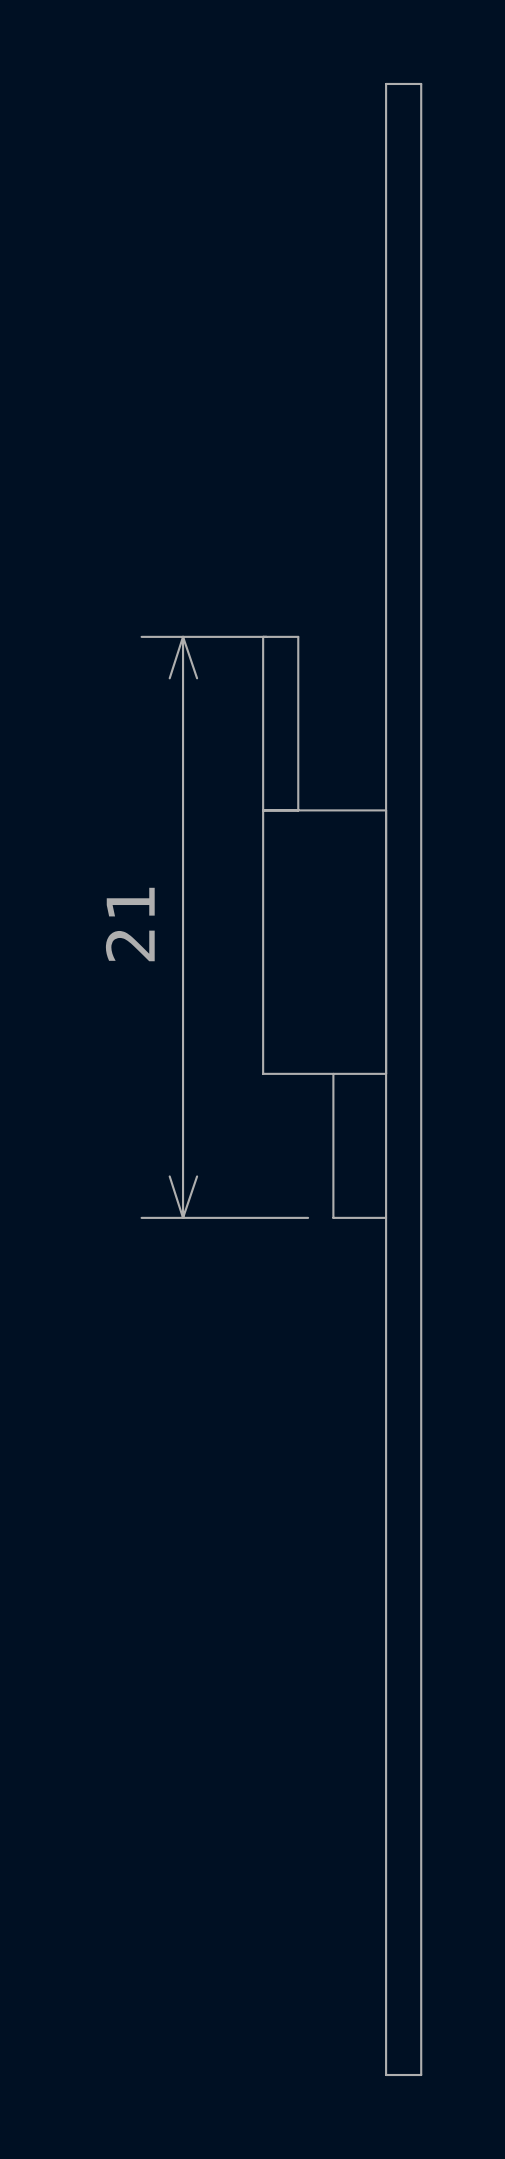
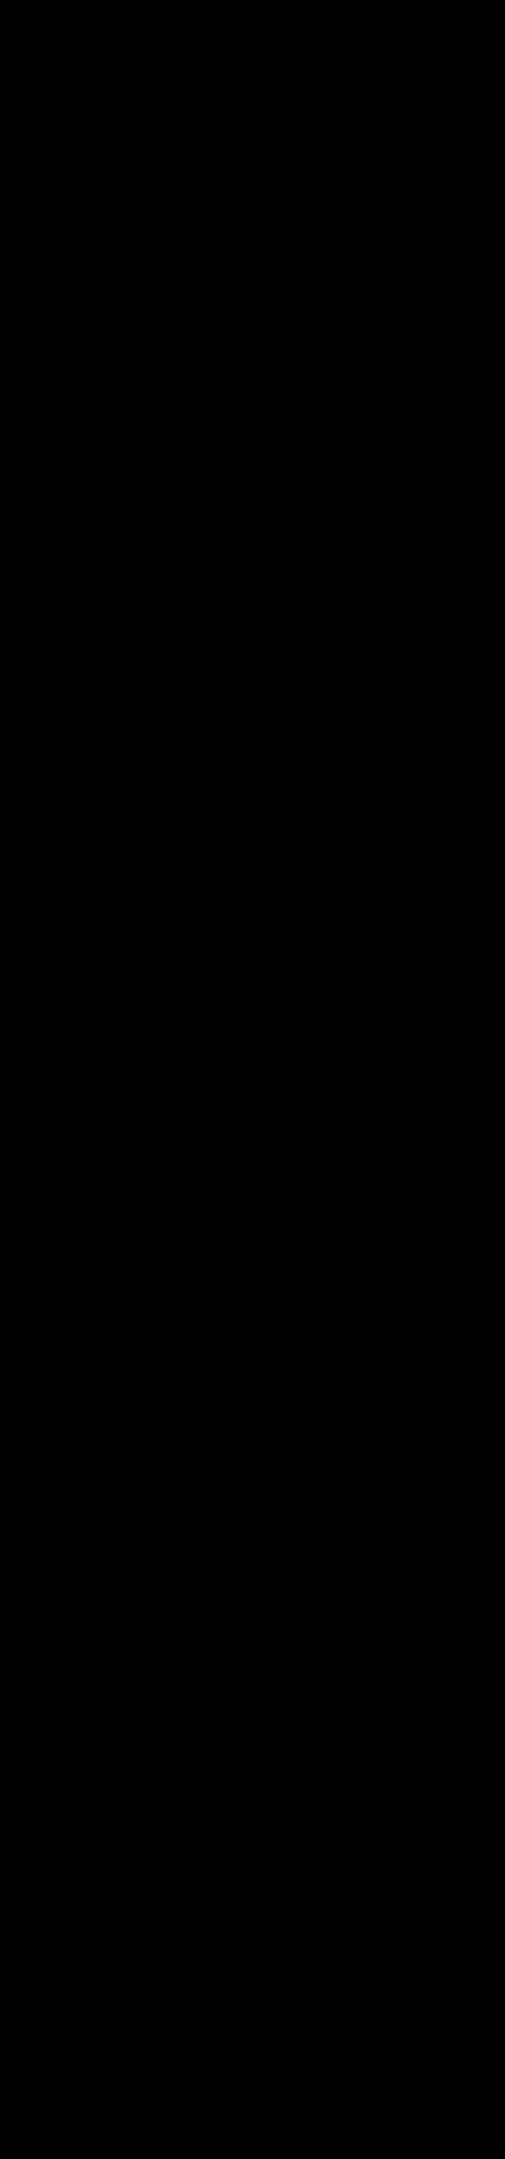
line: (421, 83) (421, 2075) (386, 2075) (386, 83) (421, 83) -> none
line: (141, 636) (298, 636) (298, 810) -> none
line: (183, 636) (169, 678) -> none
line: (183, 636) (197, 678) -> none
line: (183, 636) (183, 1217) -> none
line: (263, 636) (263, 1073) (386, 1073) -> none
line: (386, 810) (263, 810) -> none
text: 21 (130, 924) -> none
line: (333, 1073) (333, 1217) (386, 1217) -> none
line: (169, 1176) (183, 1217) -> none
line: (197, 1176) (183, 1217) -> none
line: (308, 1217) (141, 1217) -> none

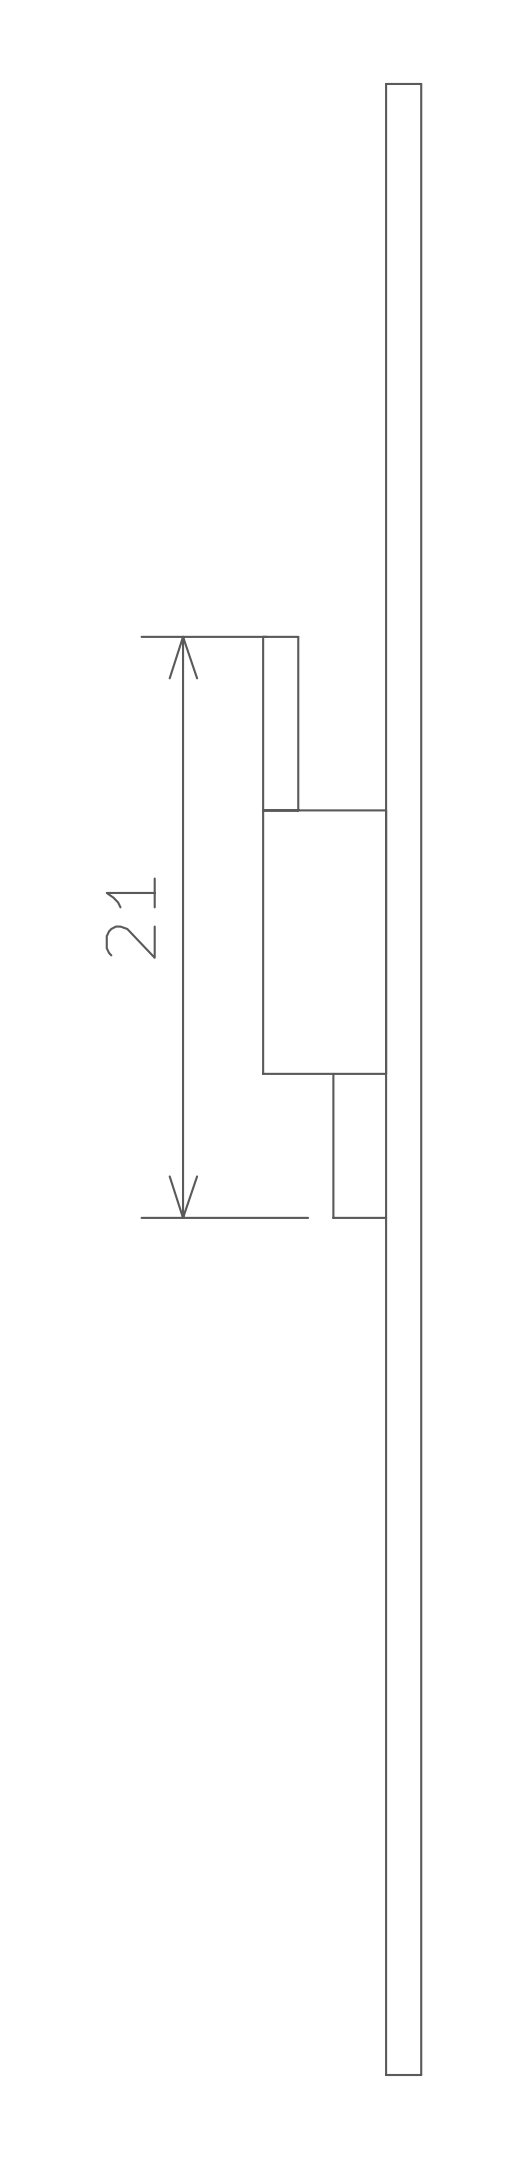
line: none -> (421, 83) (421, 2075) (386, 2075) (386, 83) (421, 83)
line: none -> (141, 636) (298, 636) (298, 810)
line: none -> (183, 636) (169, 678)
line: none -> (183, 636) (197, 678)
line: none -> (183, 636) (183, 1217)
line: none -> (263, 636) (263, 1073) (386, 1073)
line: none -> (386, 810) (263, 810)
text: none -> 21 (130, 918)
line: none -> (333, 1073) (333, 1217) (386, 1217)
line: none -> (169, 1176) (183, 1217)
line: none -> (197, 1176) (183, 1217)
line: none -> (308, 1217) (141, 1217)

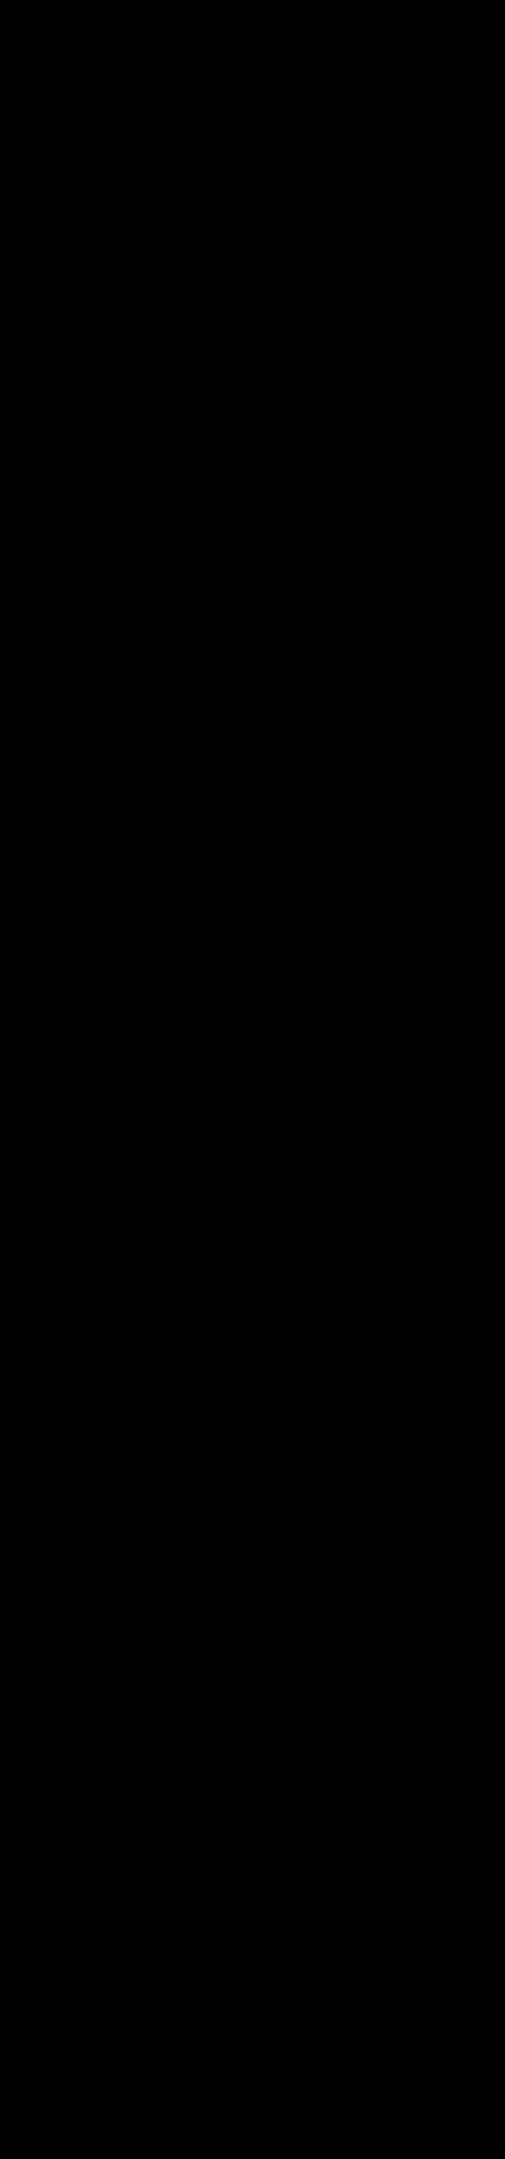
line: (421, 83) (421, 2075) (386, 2075) (386, 83) (421, 83) -> none
line: (141, 636) (298, 636) (298, 810) -> none
line: (183, 636) (169, 678) -> none
line: (183, 636) (197, 678) -> none
line: (183, 636) (183, 1217) -> none
line: (263, 636) (263, 1073) (386, 1073) -> none
line: (386, 810) (263, 810) -> none
text: 21 (130, 918) -> none
line: (333, 1073) (333, 1217) (386, 1217) -> none
line: (169, 1176) (183, 1217) -> none
line: (197, 1176) (183, 1217) -> none
line: (308, 1217) (141, 1217) -> none

